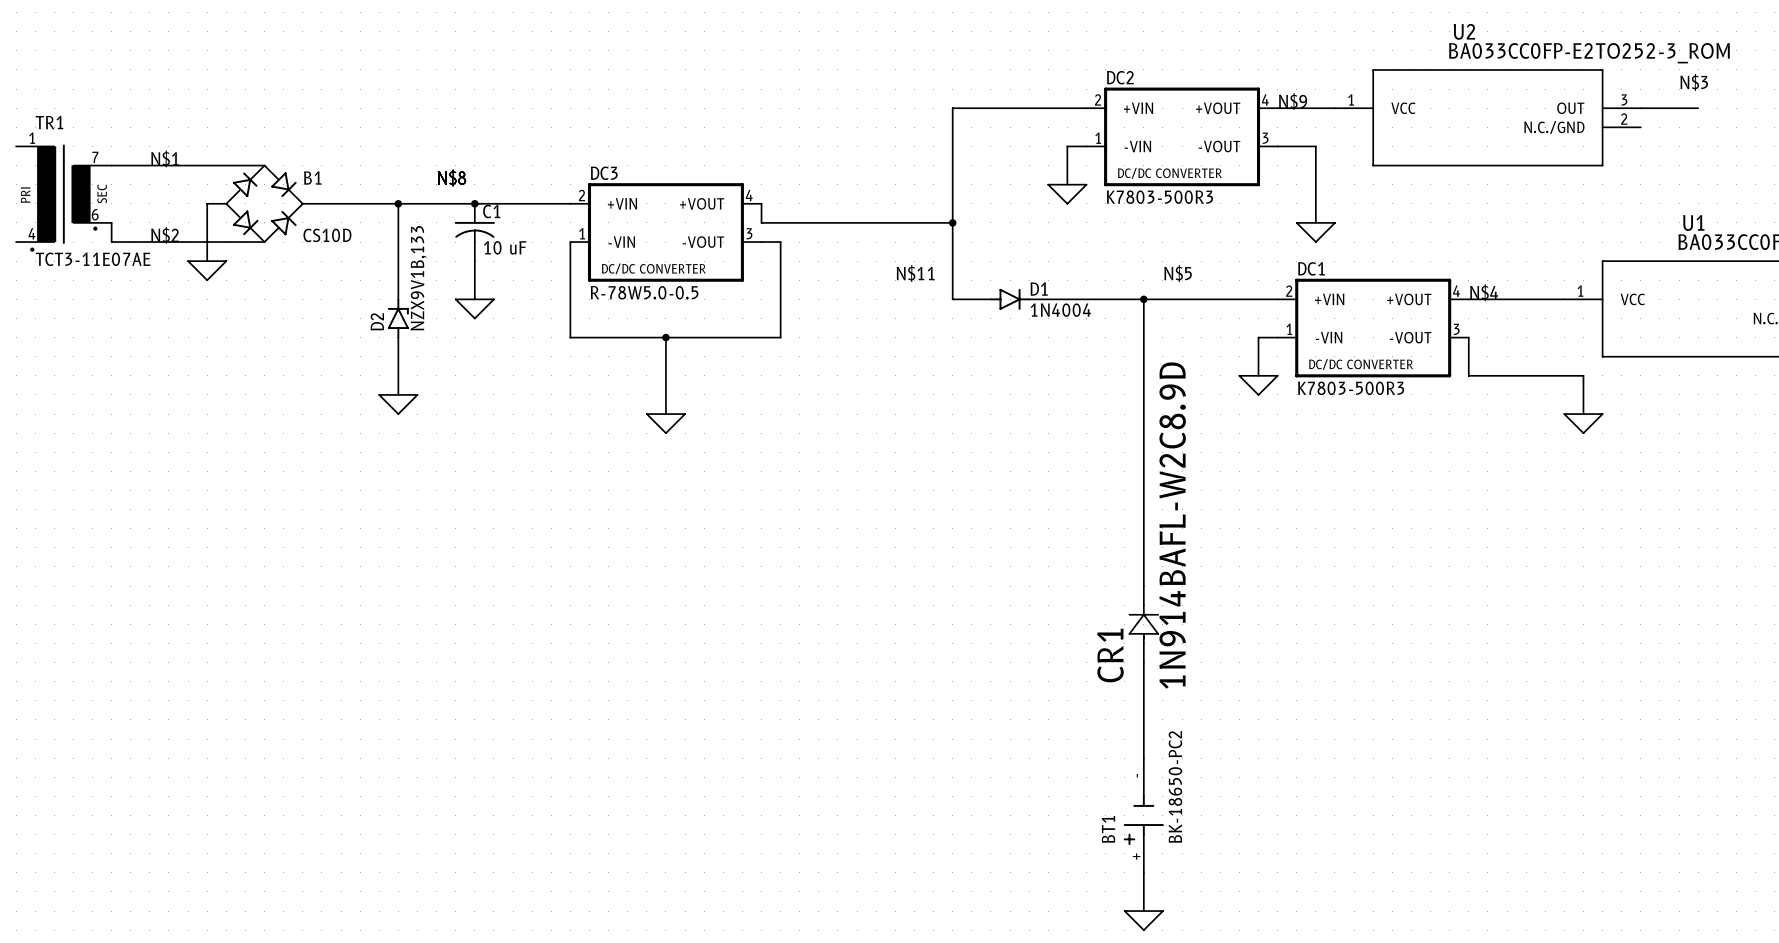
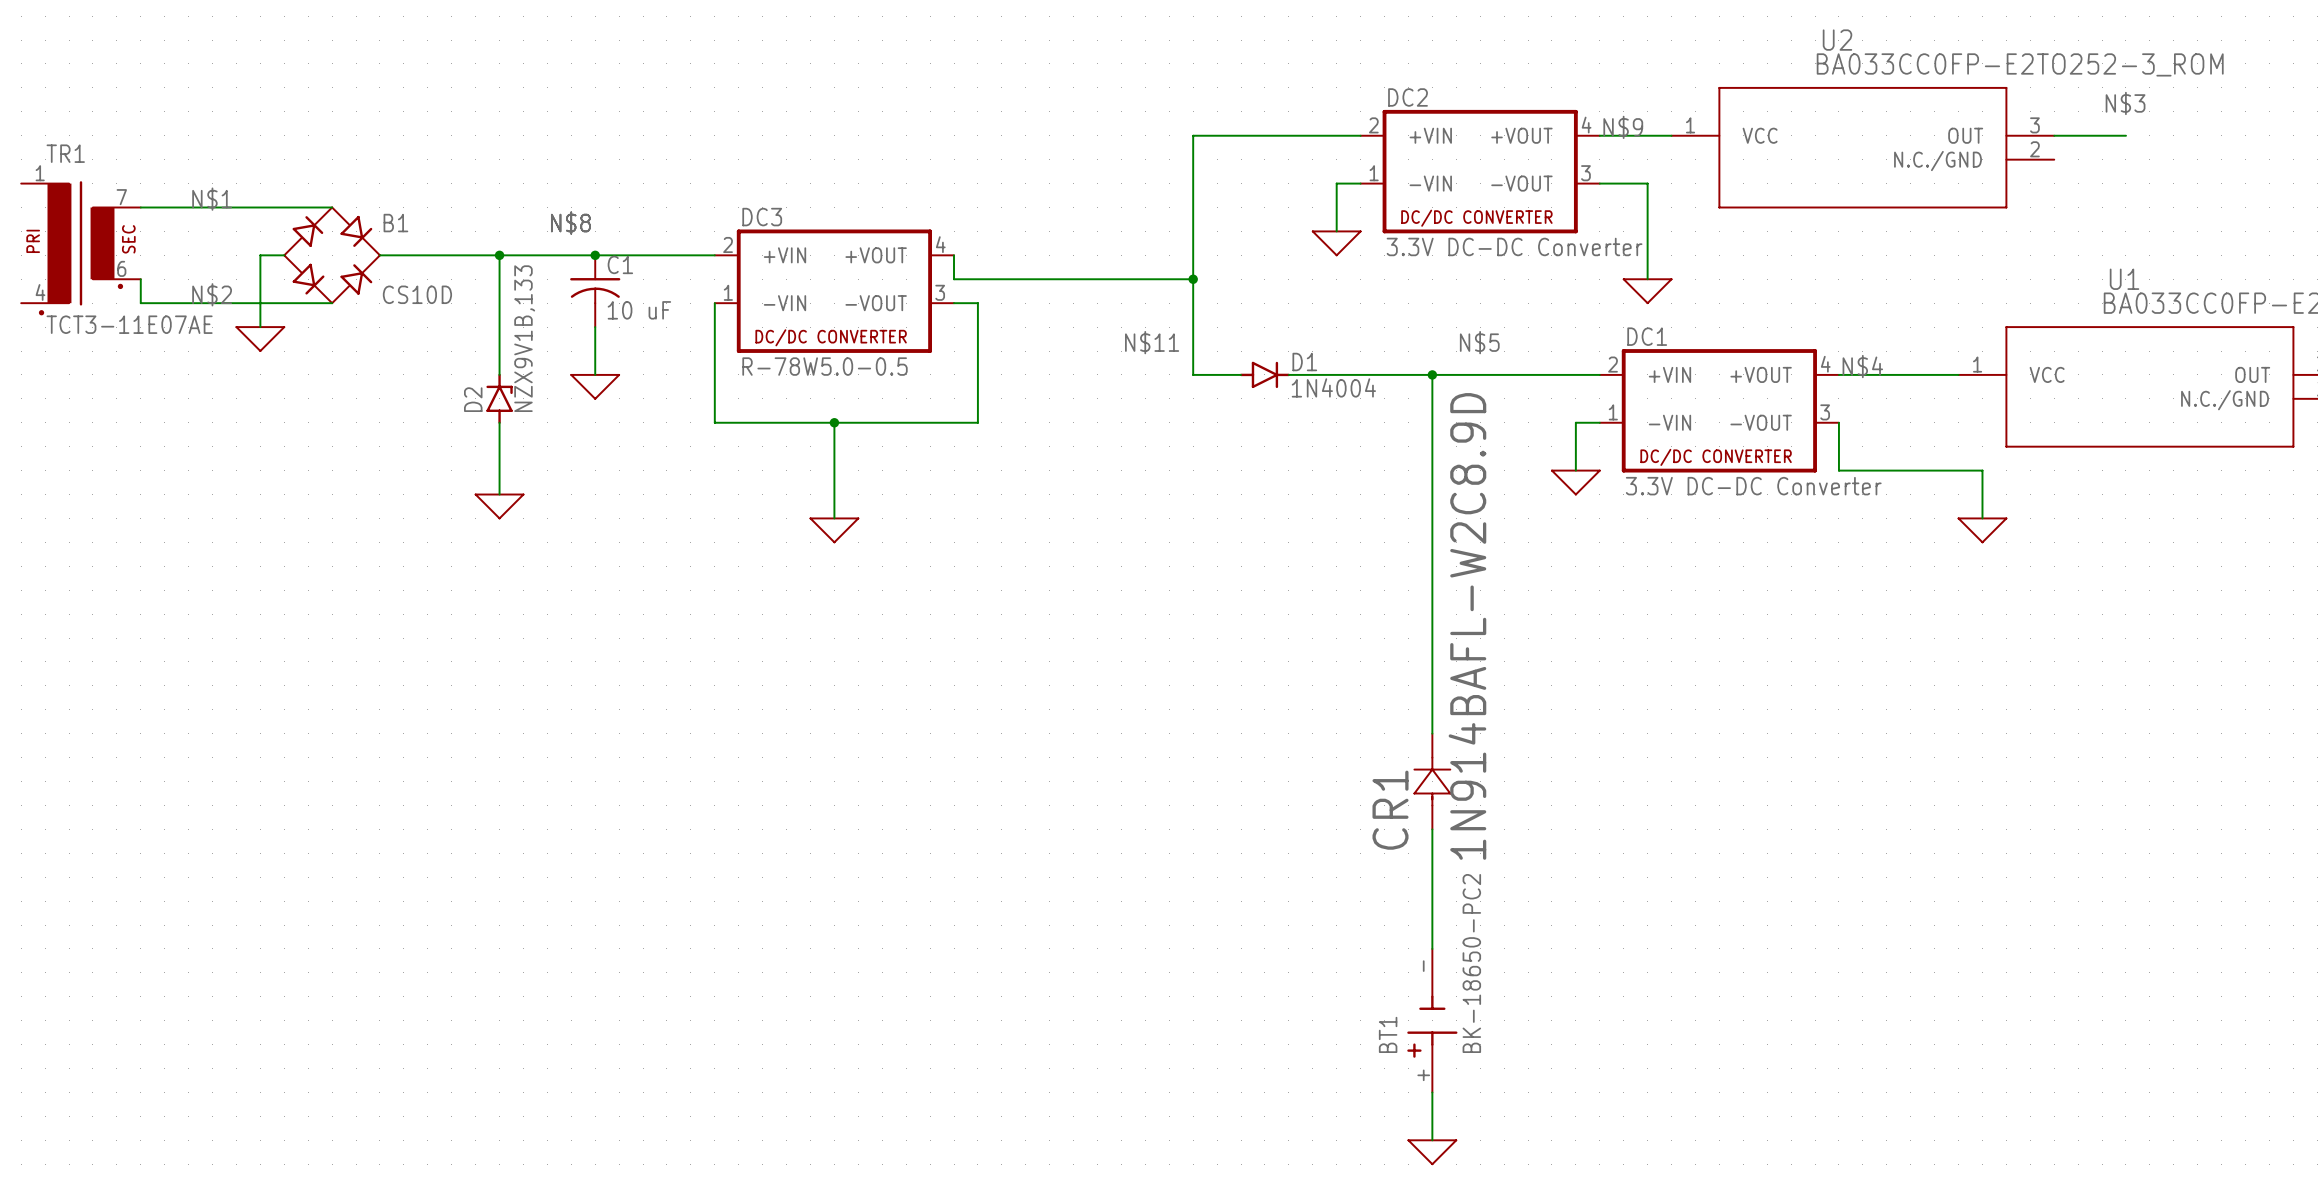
DC2 value: K7803-500R3 (1159, 197) -> 3.3V DC-DC Converter (1514, 246)
DC1 value: K7803-500R3 (1351, 388) -> 3.3V DC-DC Converter (1753, 486)

